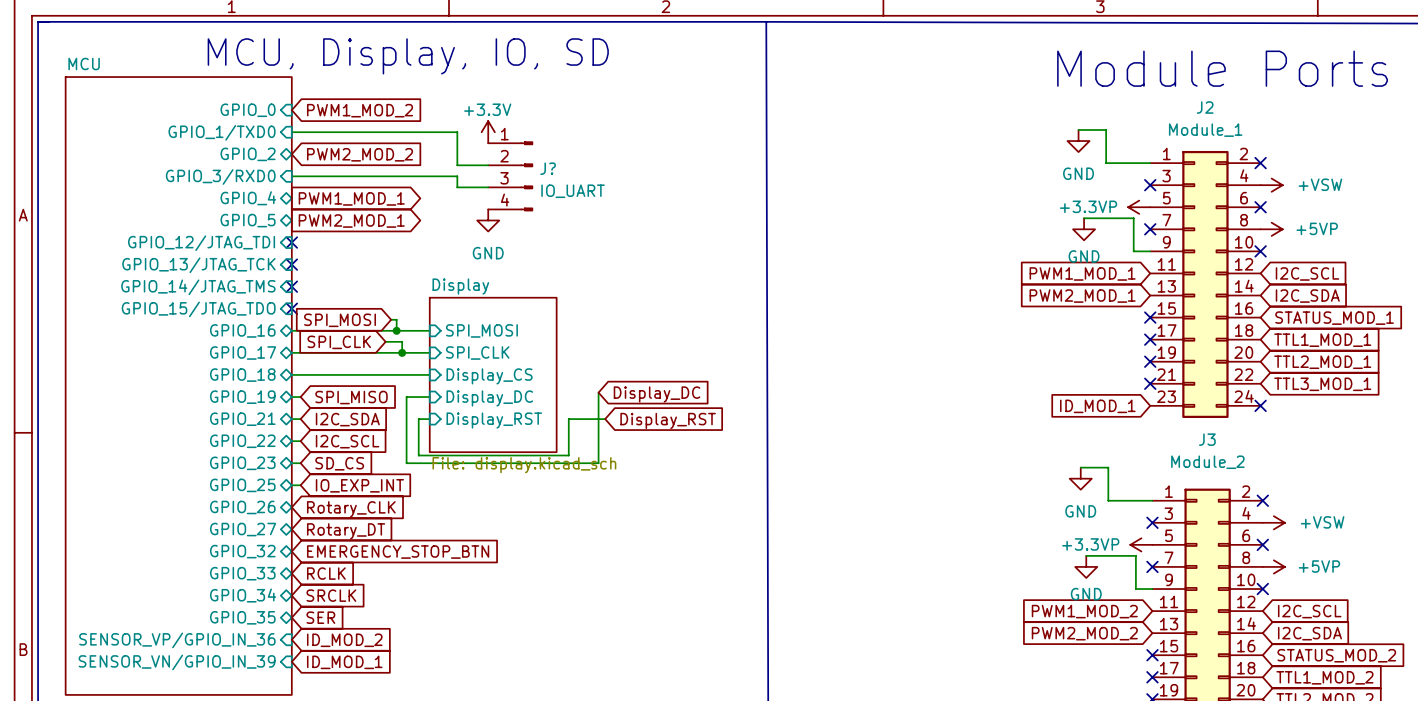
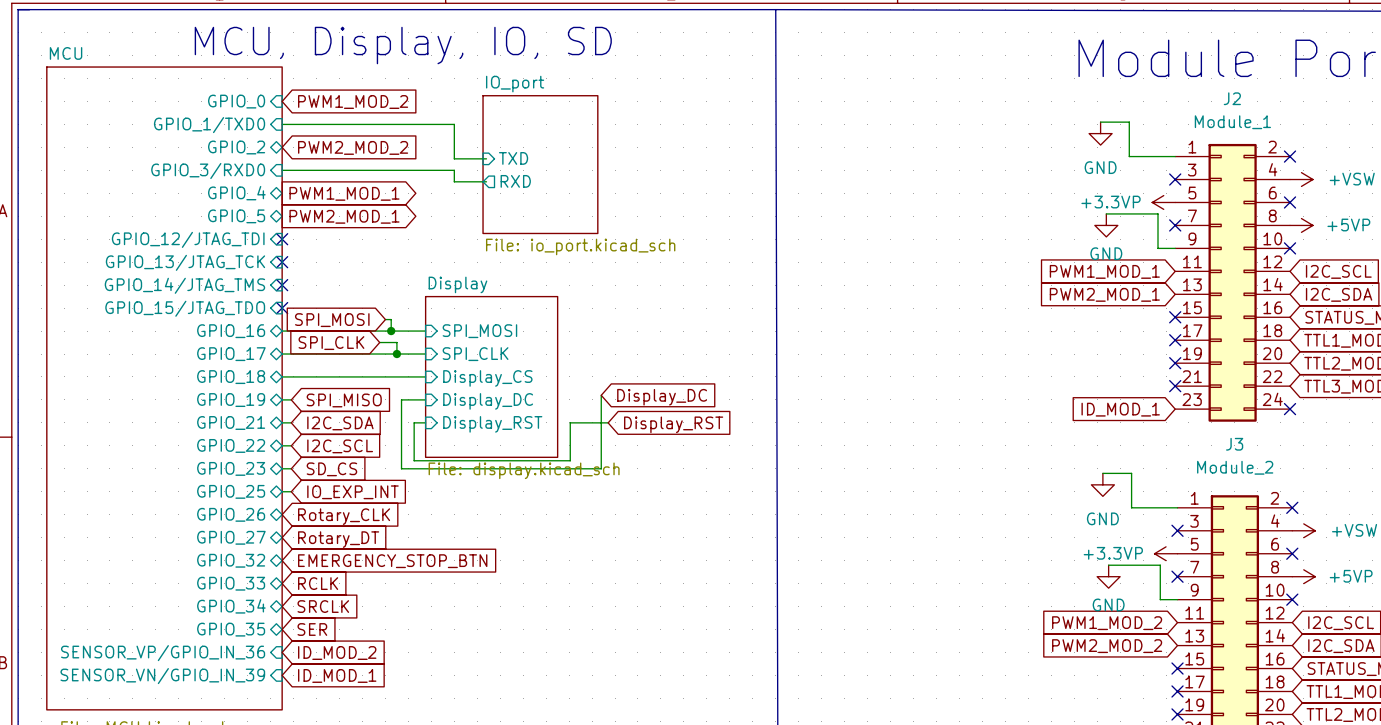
power symbol: +3.3V (488, 132) -> none
sheet pin: none -> TXD (513, 158)
sheet IO_port: none -> File: io_port.kicad_sch (540, 164)
J?: IO_UART (510, 176) -> none
sheet pin: none -> RXD (515, 181)
power symbol: GND (488, 220) -> none

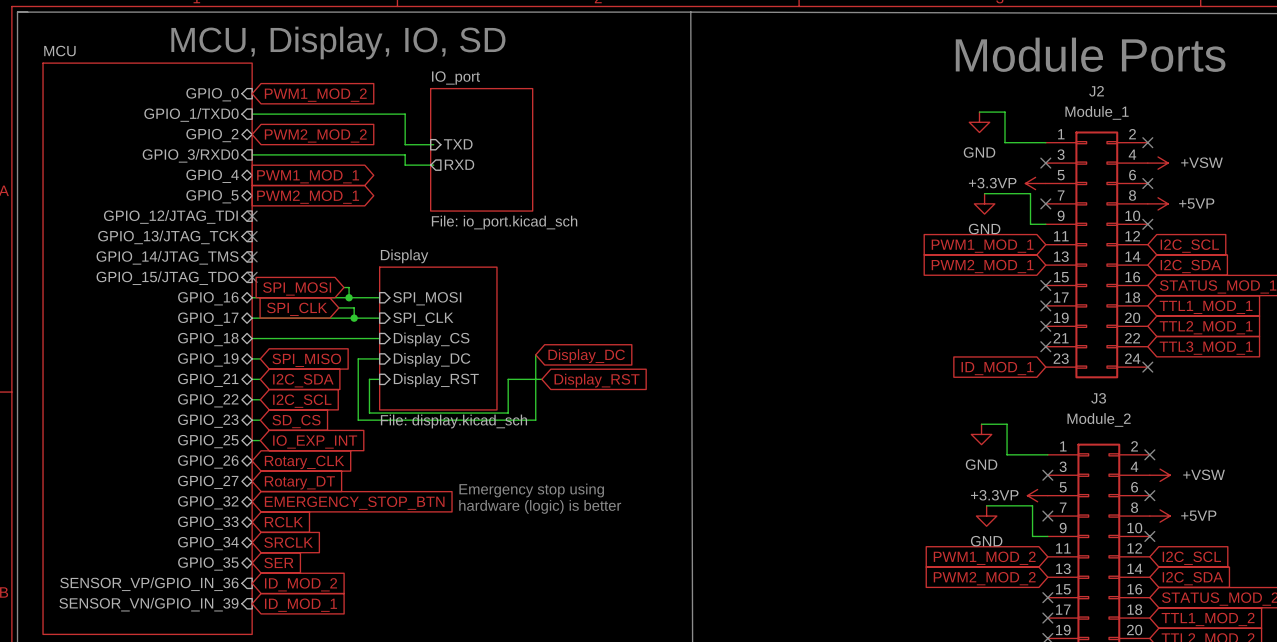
text: none -> Emergency stop using (531, 490)
text: none -> hardware (logic) is better (540, 506)

